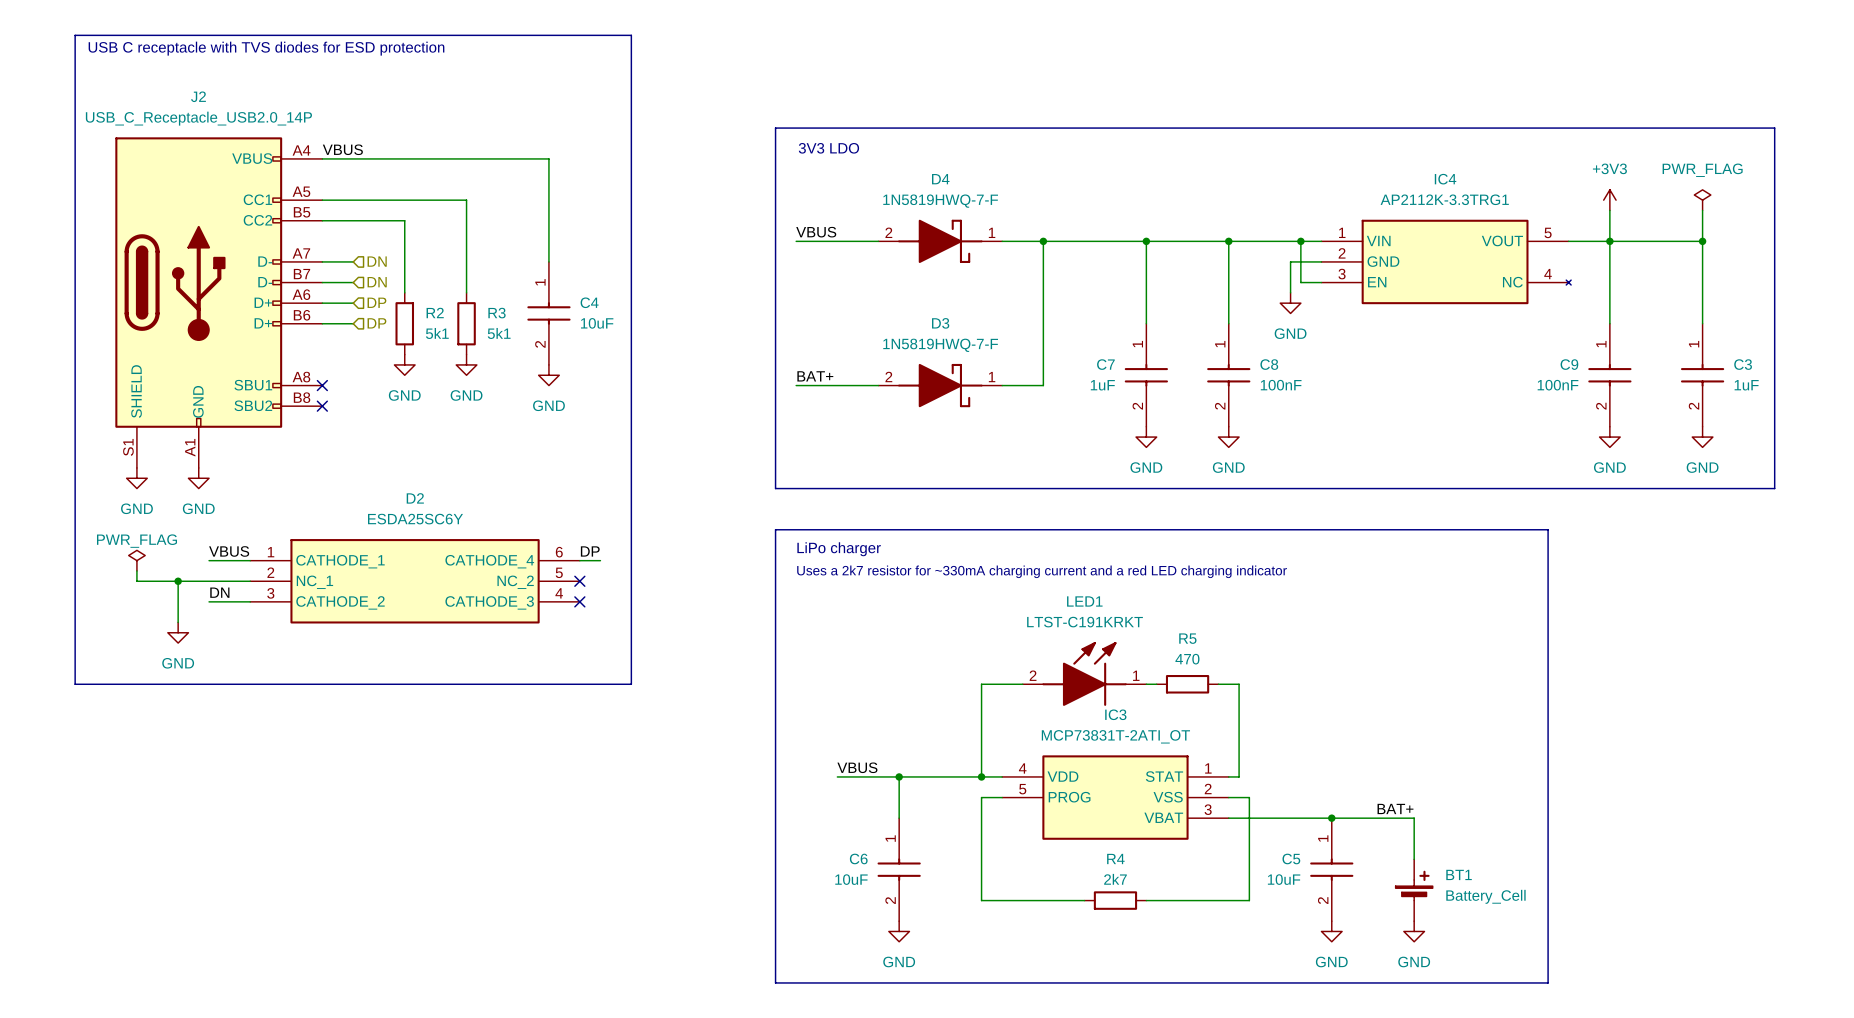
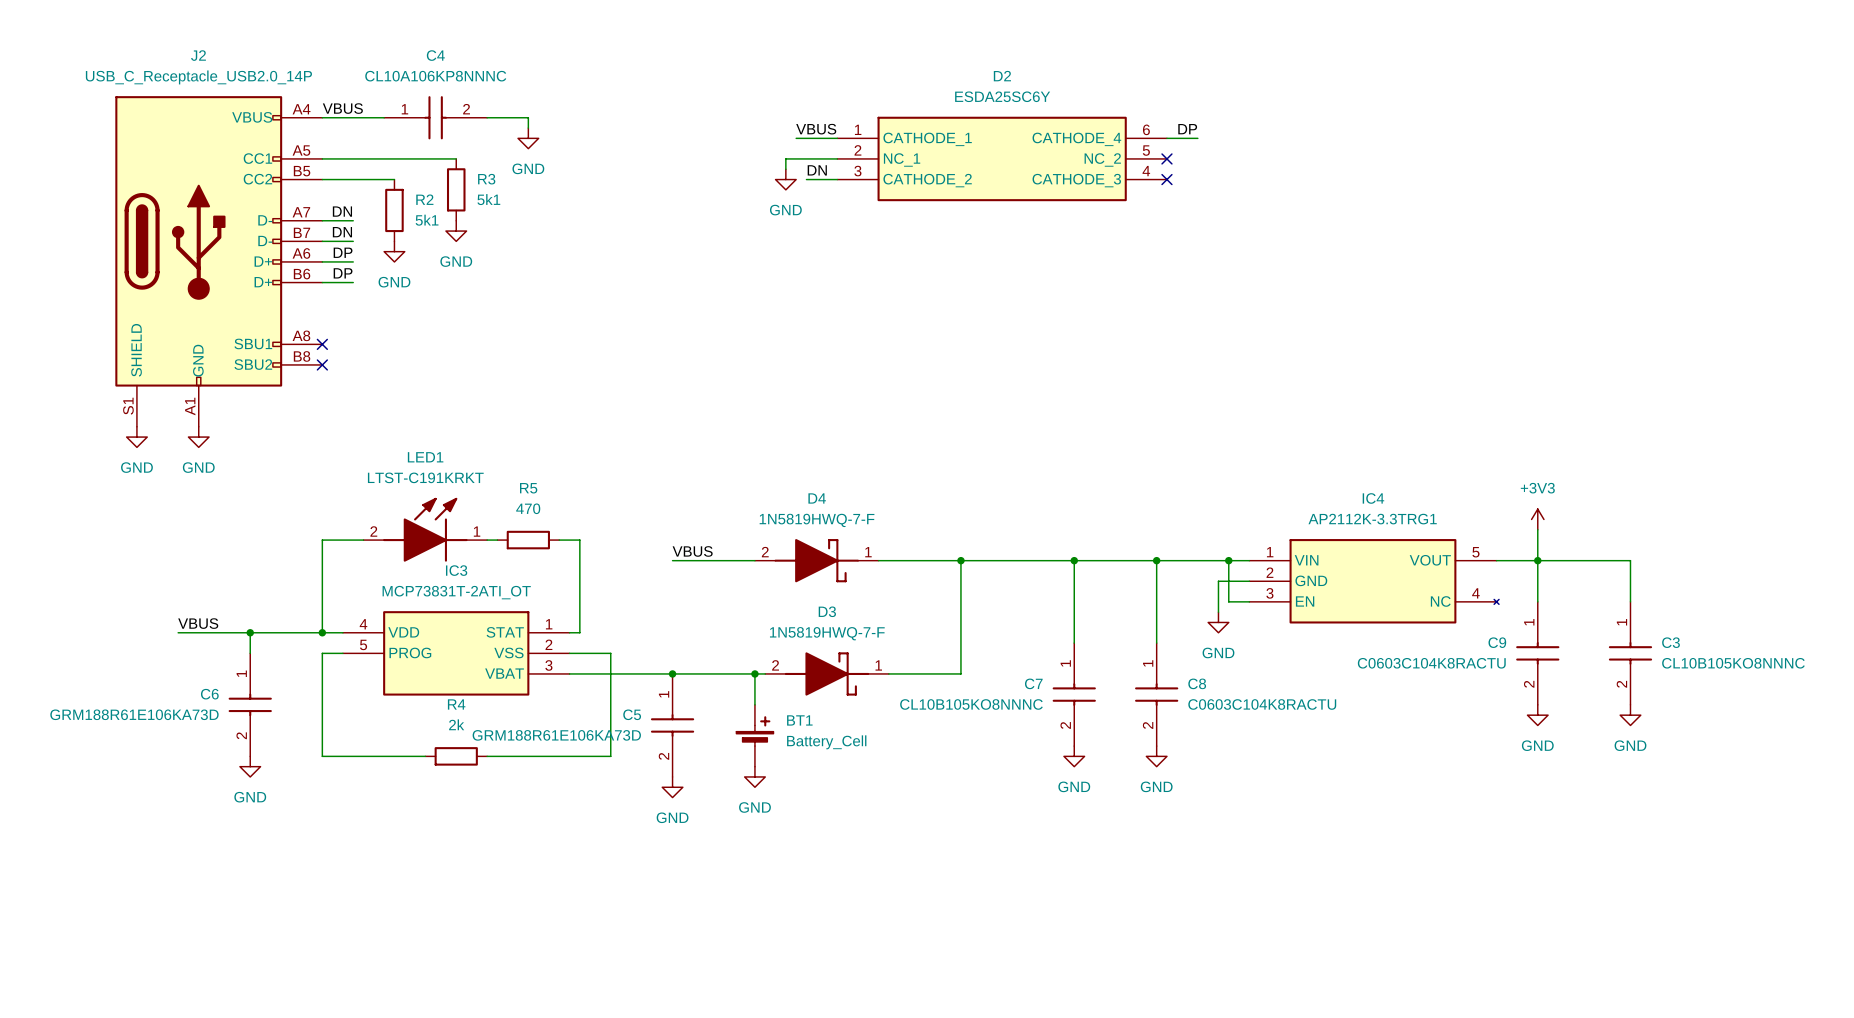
line: (75, 35) (631, 35) (631, 684) (75, 684) (75, 35) -> none
text: USB C receptacle with TVS diodes for ESD protection (266, 48) -> none
wire: none -> (322, 117) (384, 117)
wire: none -> (487, 117) (528, 117) (528, 128)
line: (775, 128) (775, 488) (1774, 488) (1774, 128) (775, 128) -> none
label: none -> DP (1187, 129)
power symbol: none -> GND (528, 138)
wire: none -> (796, 138) (837, 138)
wire: none -> (1166, 138) (1197, 138)
text: 3V3 LDO (828, 148) -> none
label position: VBUS (342, 149) -> VBUS (342, 108)
wire: (456, 158) (548, 158) (548, 261) -> none
wire: none -> (837, 158) (785, 158) (785, 169)
no-connect mark: none -> (1166, 158)
label: none -> DN (817, 170)
wire: none -> (322, 179) (394, 179)
power symbol: none -> GND (785, 179)
wire: none -> (806, 179) (837, 179)
no-connect mark: none -> (1166, 179)
wire: (322, 200) (466, 200) (466, 292) -> none
power symbol: +3V3 (1609, 200) -> none
power symbol: PWR_FLAG (1702, 200) -> none
wire: (1609, 210) (1609, 323) -> none
wire: (1702, 210) (1702, 323) -> none
label: none -> DN (342, 211)
wire: (353, 220) (404, 220) (404, 292) -> none
power symbol: none -> GND (456, 231)
label: none -> DN (342, 232)
label position: VBUS (816, 232) -> VBUS (816, 129)
wire: (796, 241) (878, 241) -> none
D4 position: (940, 241) -> (816, 560)
wire: (1002, 241) (1321, 241) -> none
wire: (1043, 241) (1043, 385) (1002, 385) -> none
junction: (1043, 241) -> none
wire: (1146, 241) (1146, 323) -> none
junction: (1146, 241) -> none
wire: (1228, 241) (1228, 323) -> none
junction: (1228, 241) -> none
wire: (1300, 241) (1300, 282) (1321, 282) -> none
junction: (1300, 241) -> none
wire: (1568, 241) (1702, 241) -> none
junction: (1609, 241) -> none
junction: (1702, 241) -> none
power symbol: none -> GND (394, 251)
label: none -> DP (343, 252)
hierarchical label: DN (377, 261) -> none
wire: (1321, 261) (1290, 261) (1290, 292) -> none
IC4 position: (1446, 261) -> (1374, 581)
label: none -> DP (343, 273)
hierarchical label: DN (377, 282) -> none
J2 position: (218, 302) -> (218, 261)
hierarchical label: DP (376, 302) -> none
C4 name position: C4 (589, 302) -> C4 (435, 55)
wire: (322, 303) (353, 303) -> (322, 241) (353, 241)
power symbol: GND (1290, 303) -> none
C4 rotation: 0° (548, 313) -> 90° counterclockwise (435, 117)
C4 position: (548, 313) -> (435, 117)
wire: (322, 323) (353, 323) -> none
hierarchical label: DP (376, 323) -> none
R2 position: (404, 323) -> (394, 210)
R3 position: (466, 323) -> (456, 189)
C4 value: 10uF (597, 323) -> CL10A106KP8NNNC (435, 76)
no-connect mark: none -> (322, 344)
no-connect mark: none -> (322, 364)
power symbol: GND (404, 364) -> none
power symbol: GND (466, 364) -> none
power symbol: GND (548, 375) -> none
C7 position: (1146, 375) -> (1074, 694)
C8 position: (1228, 375) -> (1156, 694)
C9 position: (1609, 375) -> (1537, 653)
C3 position: (1702, 375) -> (1630, 653)
label: BAT+ (815, 376) -> none
no-connect mark: (322, 385) -> none
wire: (796, 385) (878, 385) -> none
D3 position: (940, 385) -> (827, 673)
C7 value: 1uF (1102, 385) -> CL10B105KO8NNNC (971, 704)
C8 value: 100nF (1281, 385) -> C0603C104K8RACTU (1262, 704)
C9 value: 100nF (1558, 385) -> C0603C104K8RACTU (1431, 663)
C3 value: 1uF (1746, 385) -> CL10B105KO8NNNC (1733, 663)
no-connect mark: (322, 406) -> none
power symbol: none -> GND (136, 437)
power symbol: none -> GND (198, 437)
power symbol: GND (1146, 437) -> none
power symbol: GND (1228, 437) -> none
power symbol: GND (1609, 437) -> none
power symbol: GND (1702, 437) -> none
power symbol: GND (136, 478) -> none
power symbol: GND (198, 478) -> none
power symbol: none -> +3V3 (1537, 519)
line: (775, 529) (1548, 529) (1548, 982) (775, 982) (775, 529) -> none
wire: none -> (1537, 529) (1537, 601)
wire: none -> (559, 540) (579, 540) (579, 632) (569, 632)
text: LiPo charger (839, 549) -> none
label position: VBUS (229, 551) -> VBUS (198, 623)
label: DP (590, 551) -> none
label: none -> VBUS (692, 551)
power symbol: PWR_FLAG (136, 560) -> none
wire: (209, 560) (250, 560) -> none
wire: (579, 560) (600, 560) -> none
wire: none -> (672, 560) (754, 560)
wire: none -> (878, 560) (1249, 560)
wire: none -> (960, 560) (960, 673) (888, 673)
junction: none -> (960, 560)
wire: none -> (1074, 560) (1074, 643)
junction: none -> (1074, 560)
wire: none -> (1156, 560) (1156, 643)
junction: none -> (1156, 560)
wire: none -> (1228, 560) (1228, 601) (1249, 601)
junction: none -> (1228, 560)
wire: none -> (1496, 560) (1630, 560) (1630, 601)
junction: none -> (1537, 560)
wire: (136, 570) (136, 581) (250, 581) -> none
text: Uses a 2k7 resistor for ~330mA charging current and a red LED charging indicator (1042, 571) -> none
wire: (178, 581) (178, 622) -> none
junction: (178, 581) -> none
D2 position: (415, 581) -> (1002, 158)
no-connect mark: (579, 581) -> none
wire: none -> (1249, 581) (1218, 581) (1218, 612)
label: DN (219, 592) -> none
wire: (209, 601) (250, 601) -> none
no-connect mark: (579, 601) -> none
power symbol: none -> GND (1218, 622)
wire: none -> (178, 632) (342, 632)
power symbol: GND (178, 632) -> none
wire: none -> (250, 632) (250, 653)
junction: none -> (250, 632)
junction: none -> (322, 632)
R5 name position: R5 (1187, 638) -> R5 (528, 488)
wire: none -> (342, 653) (322, 653) (322, 756) (425, 756)
wire: none -> (569, 653) (610, 653) (610, 756) (487, 756)
R5 value position: 470 (1187, 659) -> 470 (528, 508)
wire: none -> (569, 673) (765, 673)
junction: none -> (672, 673)
wire: none -> (754, 673) (754, 704)
junction: none -> (754, 673)
LED1 position: (1084, 673) -> (425, 529)
wire: (1022, 684) (981, 684) (981, 776) -> none
wire: (1146, 684) (1156, 684) -> none
R5 position: (1187, 684) -> (528, 540)
wire: (1218, 684) (1239, 684) (1239, 776) (1228, 776) -> none
power symbol: none -> GND (1537, 715)
power symbol: none -> GND (1630, 715)
power symbol: none -> GND (1074, 756)
power symbol: none -> GND (1156, 756)
power symbol: none -> GND (250, 766)
label: VBUS (857, 767) -> none
power symbol: none -> GND (754, 776)
wire: (837, 776) (1002, 776) -> none
wire: (899, 776) (899, 818) -> none
junction: (899, 776) -> none
junction: (981, 776) -> none
power symbol: none -> GND (672, 787)
wire: (1002, 797) (981, 797) (981, 900) (1084, 900) -> none
IC3 position: (1115, 797) -> (456, 653)
wire: (1228, 797) (1249, 797) (1249, 900) (1146, 900) -> none
label: BAT+ (1395, 808) -> none
wire: (1228, 818) (1414, 818) (1414, 859) -> none
junction: (1331, 818) -> none
R4 name position: R4 (1115, 858) -> R4 (456, 704)
C6 position: (899, 869) -> (250, 704)
C5 position: (1331, 869) -> (672, 725)
C6 value: 10uF (851, 879) -> GRM188R61E106KA73D (134, 714)
R4 value: 2k7 (1115, 879) -> 2k (456, 724)
C5 value: 10uF (1284, 879) -> GRM188R61E106KA73D (556, 735)
BT1 position: (1414, 890) -> (754, 735)
R4 position: (1115, 900) -> (456, 756)
power symbol: GND (899, 931) -> none
power symbol: GND (1331, 931) -> none
power symbol: GND (1414, 931) -> none

